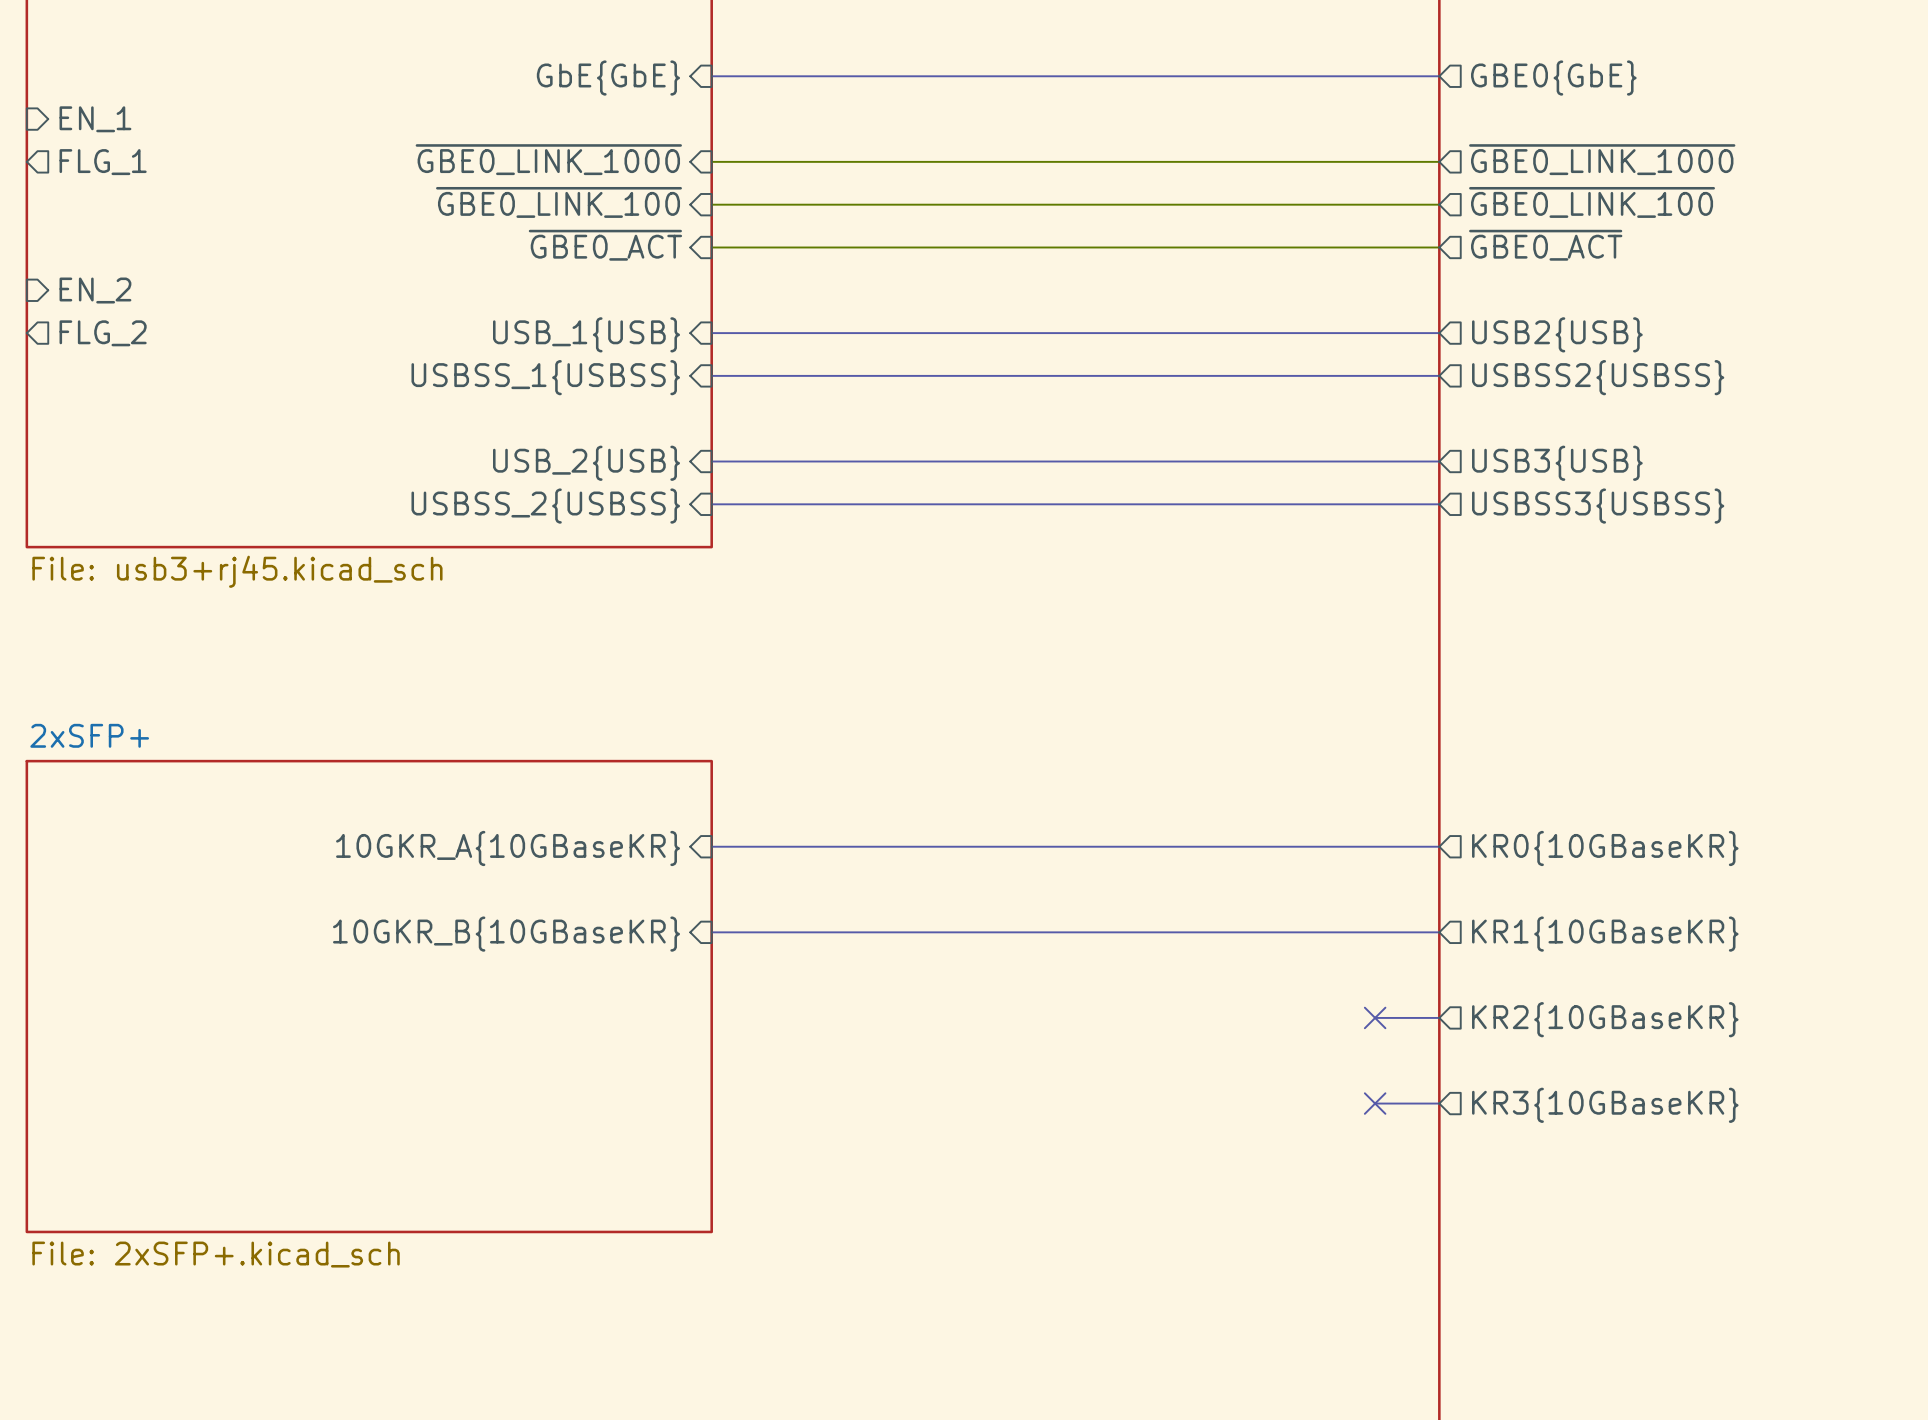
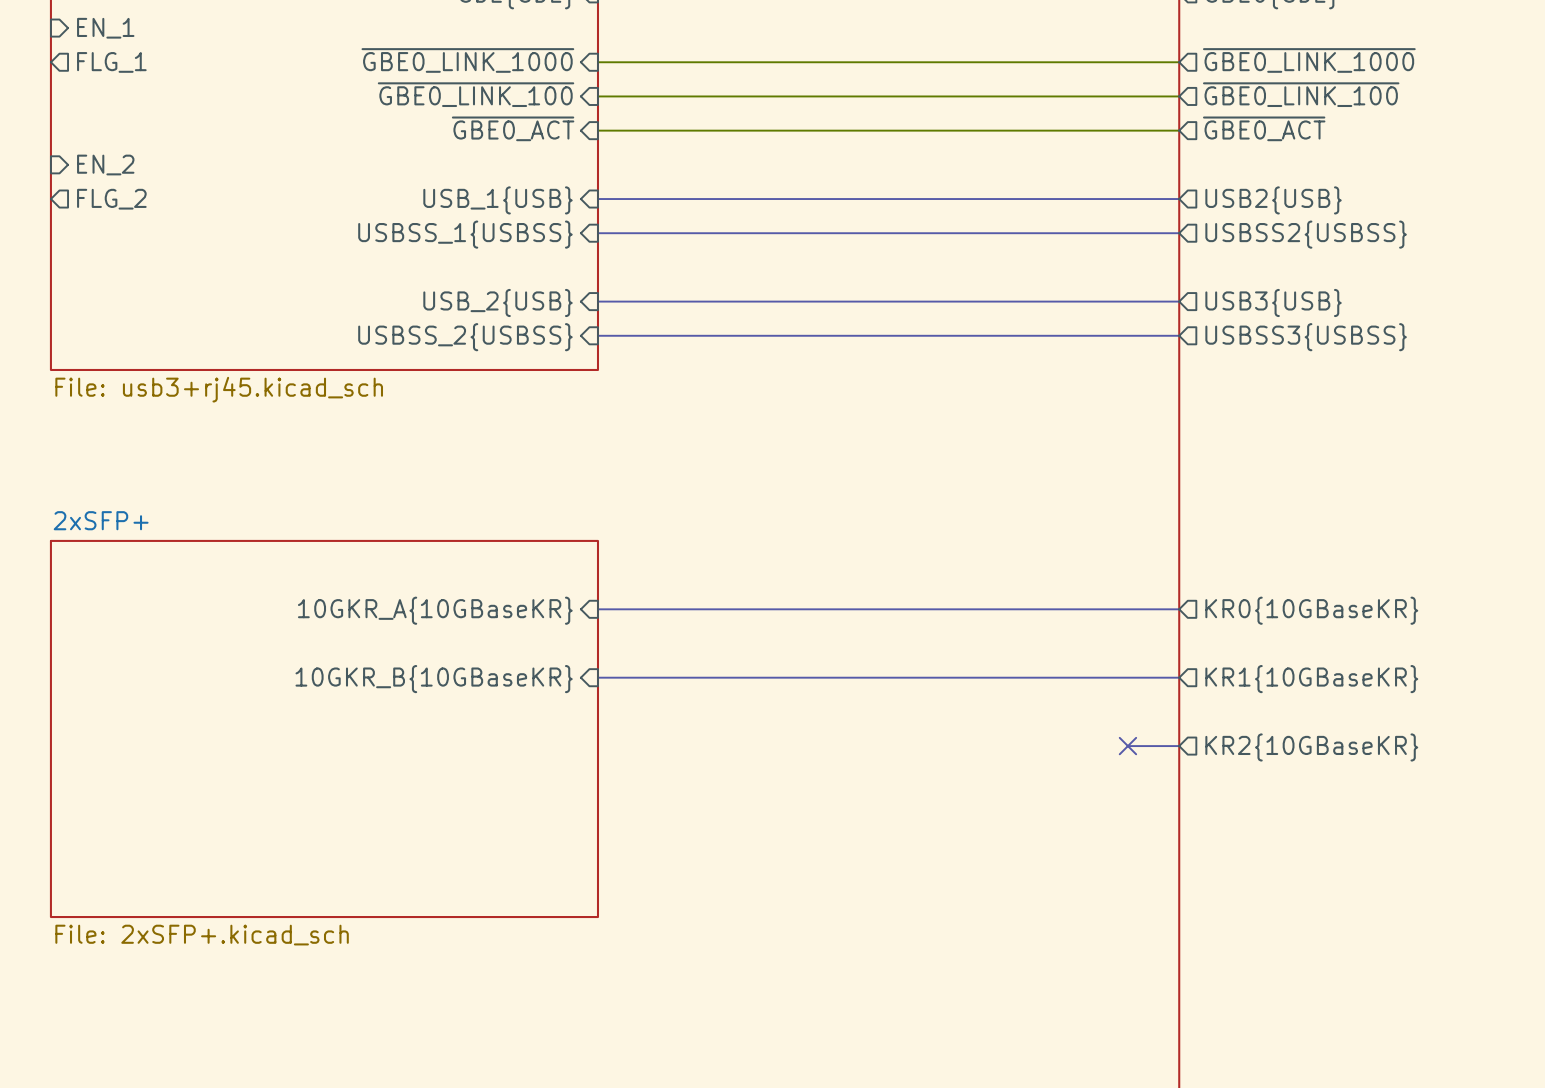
bus: (1375, 1103) (1439, 1103) -> none
no-connect mark: (1375, 1103) -> none
sheet pin: KR3{10GBaseKR} (1605, 1105) -> none

